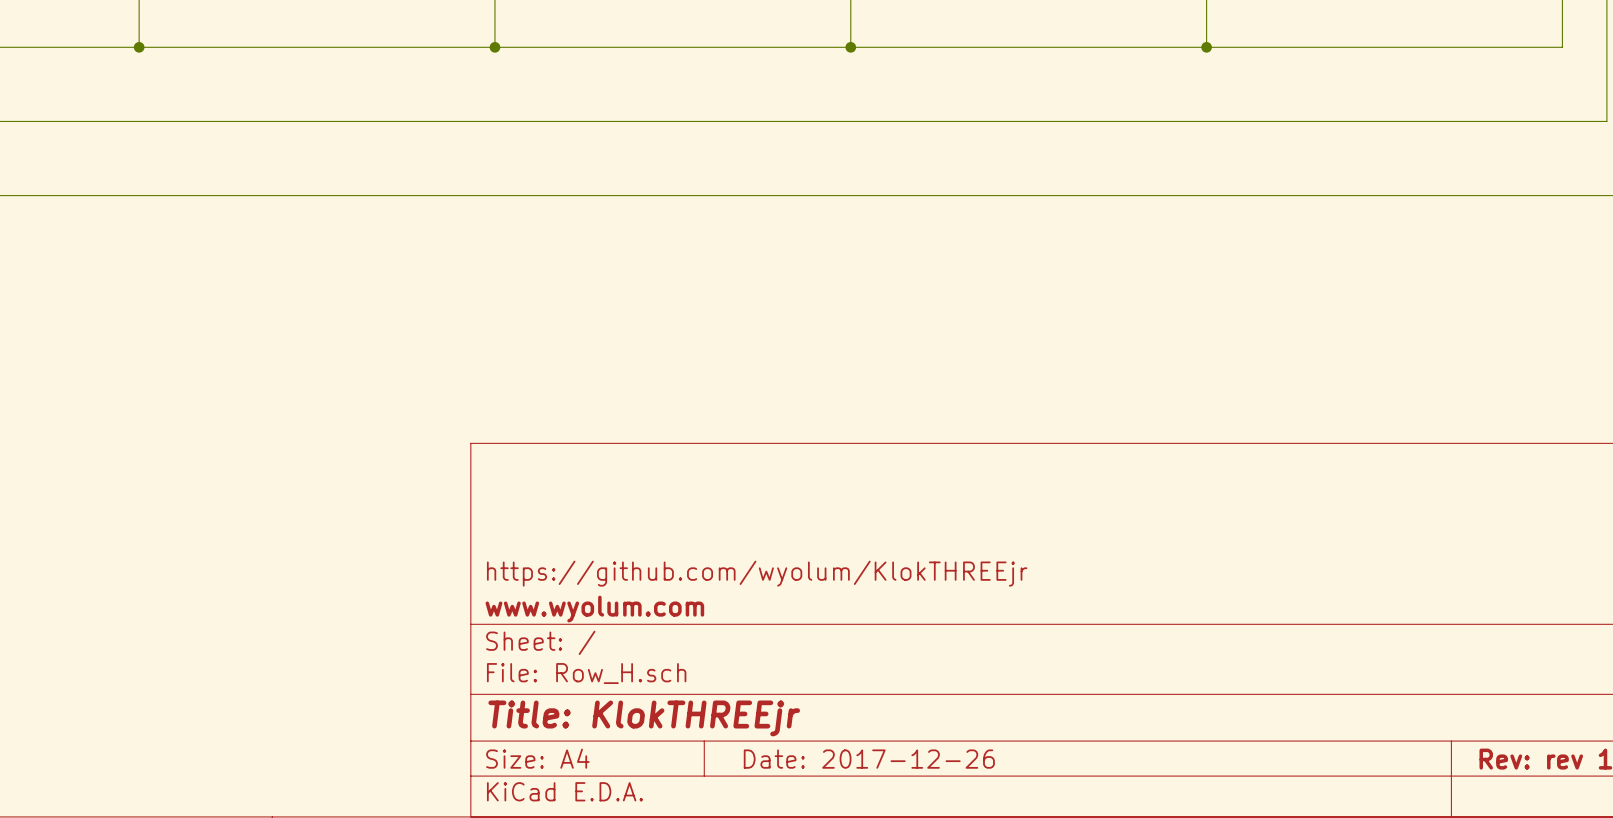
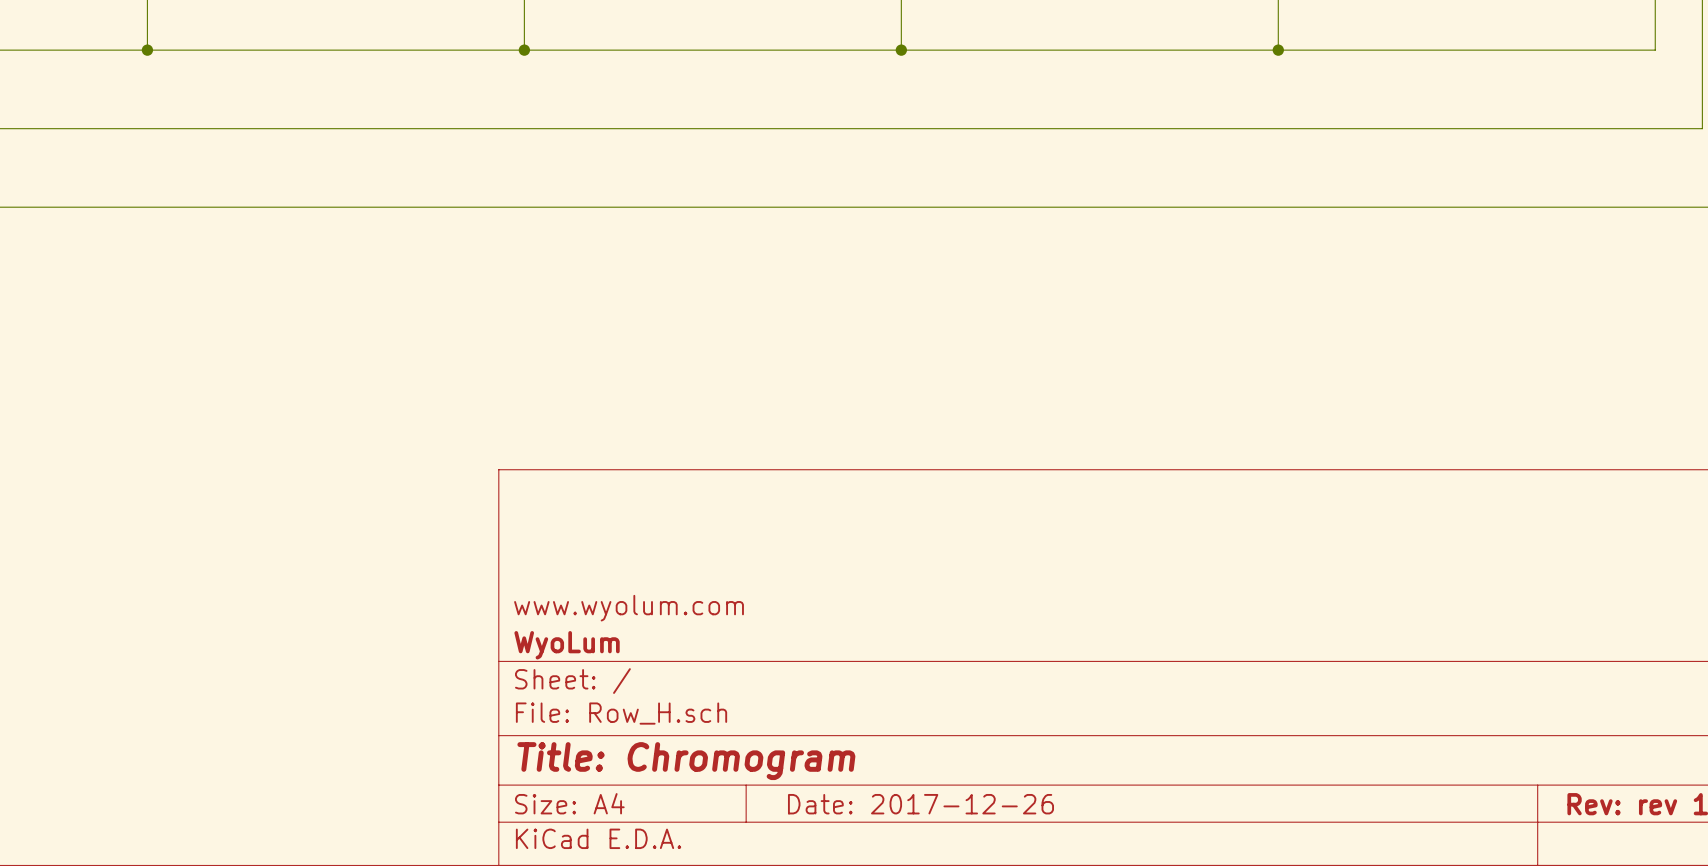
title block: https://github.com/wyolum/KlokTHREEjr (757, 573) -> www.wyolum.com (629, 608)
title block: www.wyolum.com (594, 609) -> WyoLum (567, 645)
title block: Title: KlokTHREEjr (644, 718) -> Title: Chromogram (686, 761)

